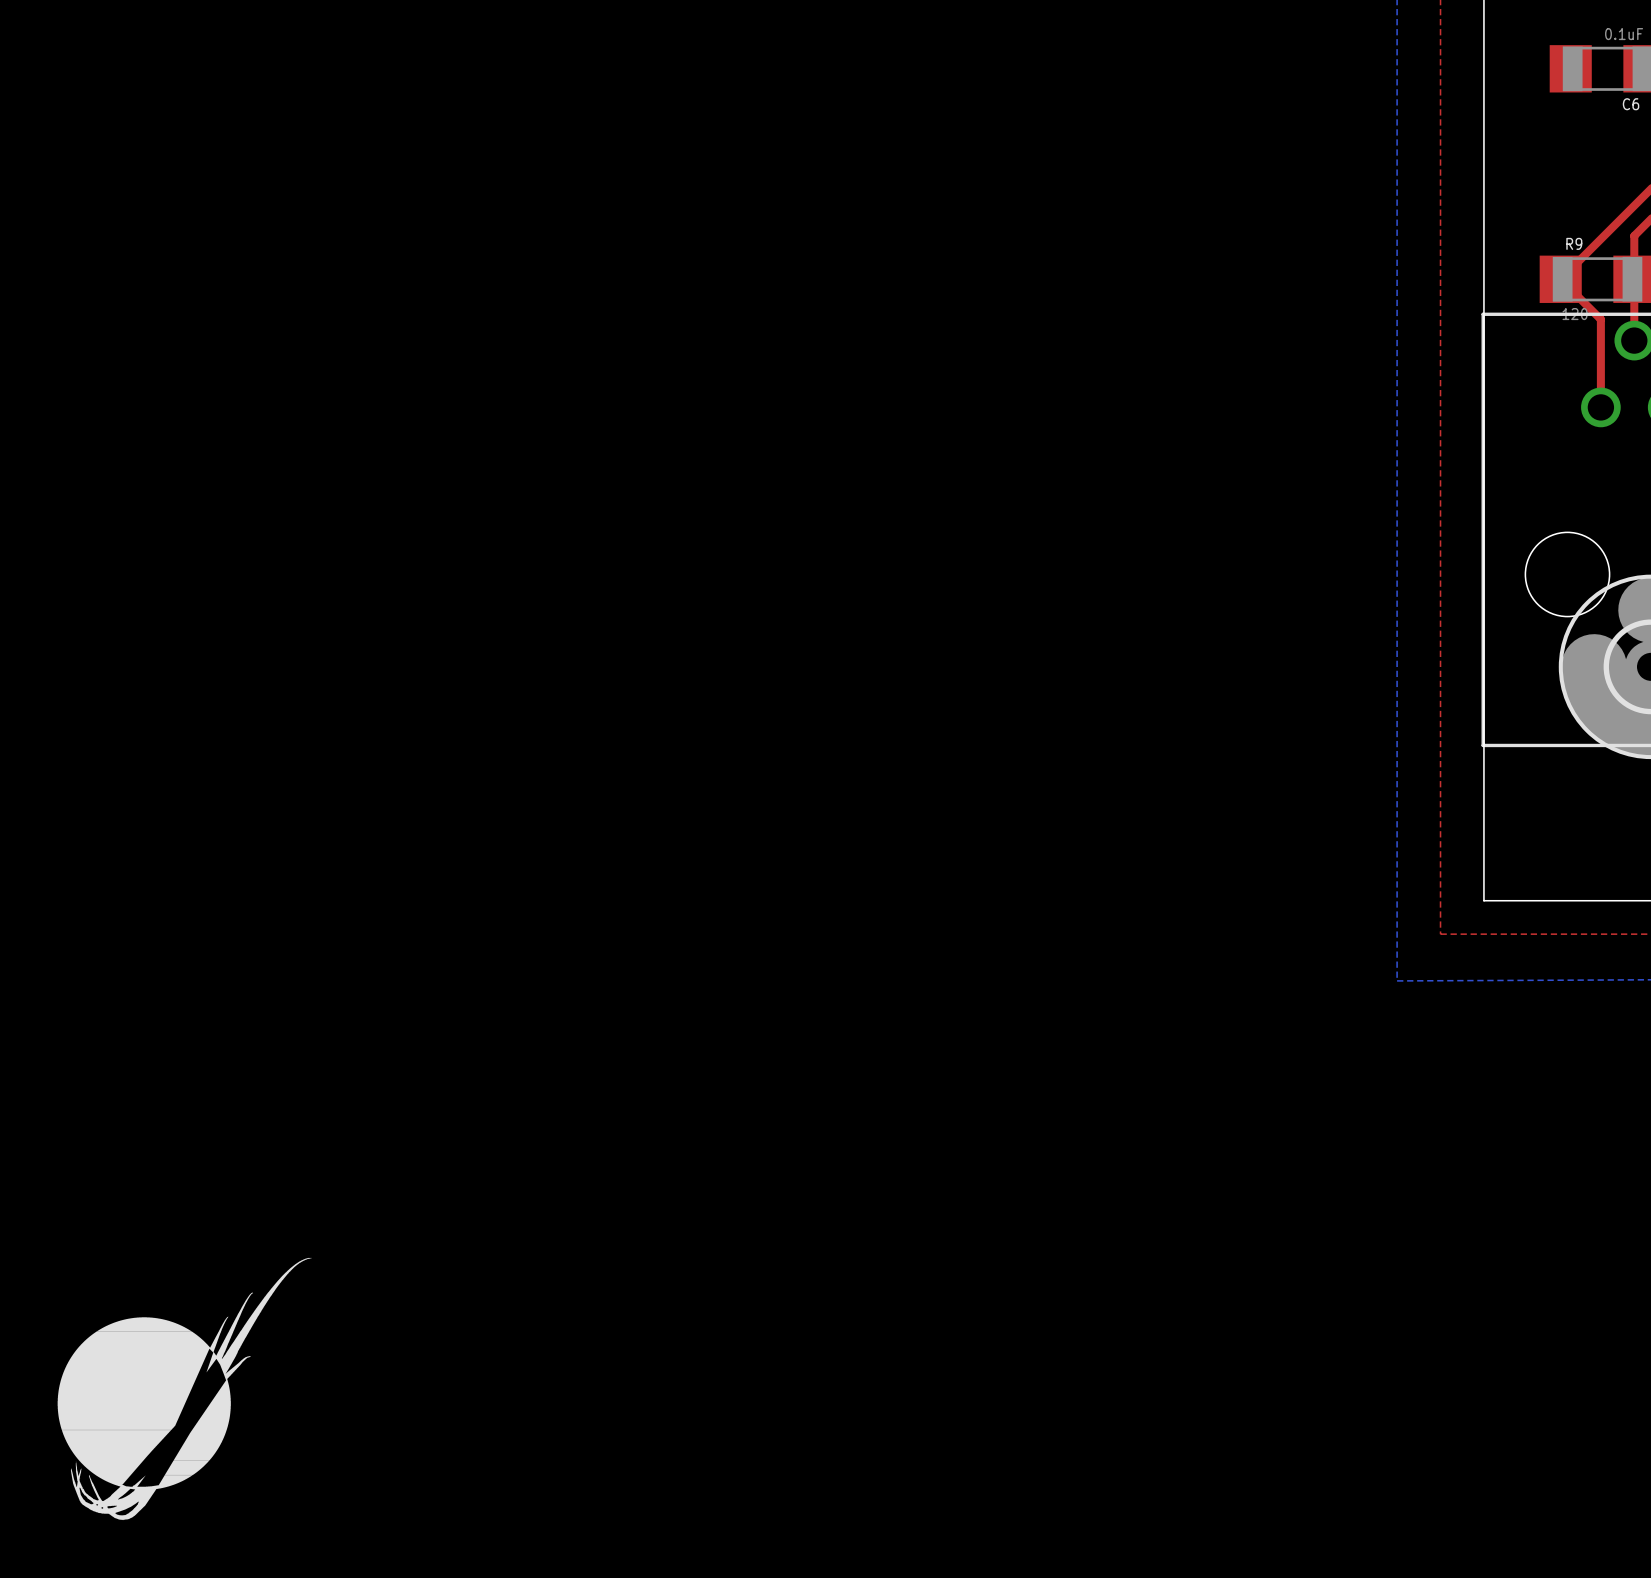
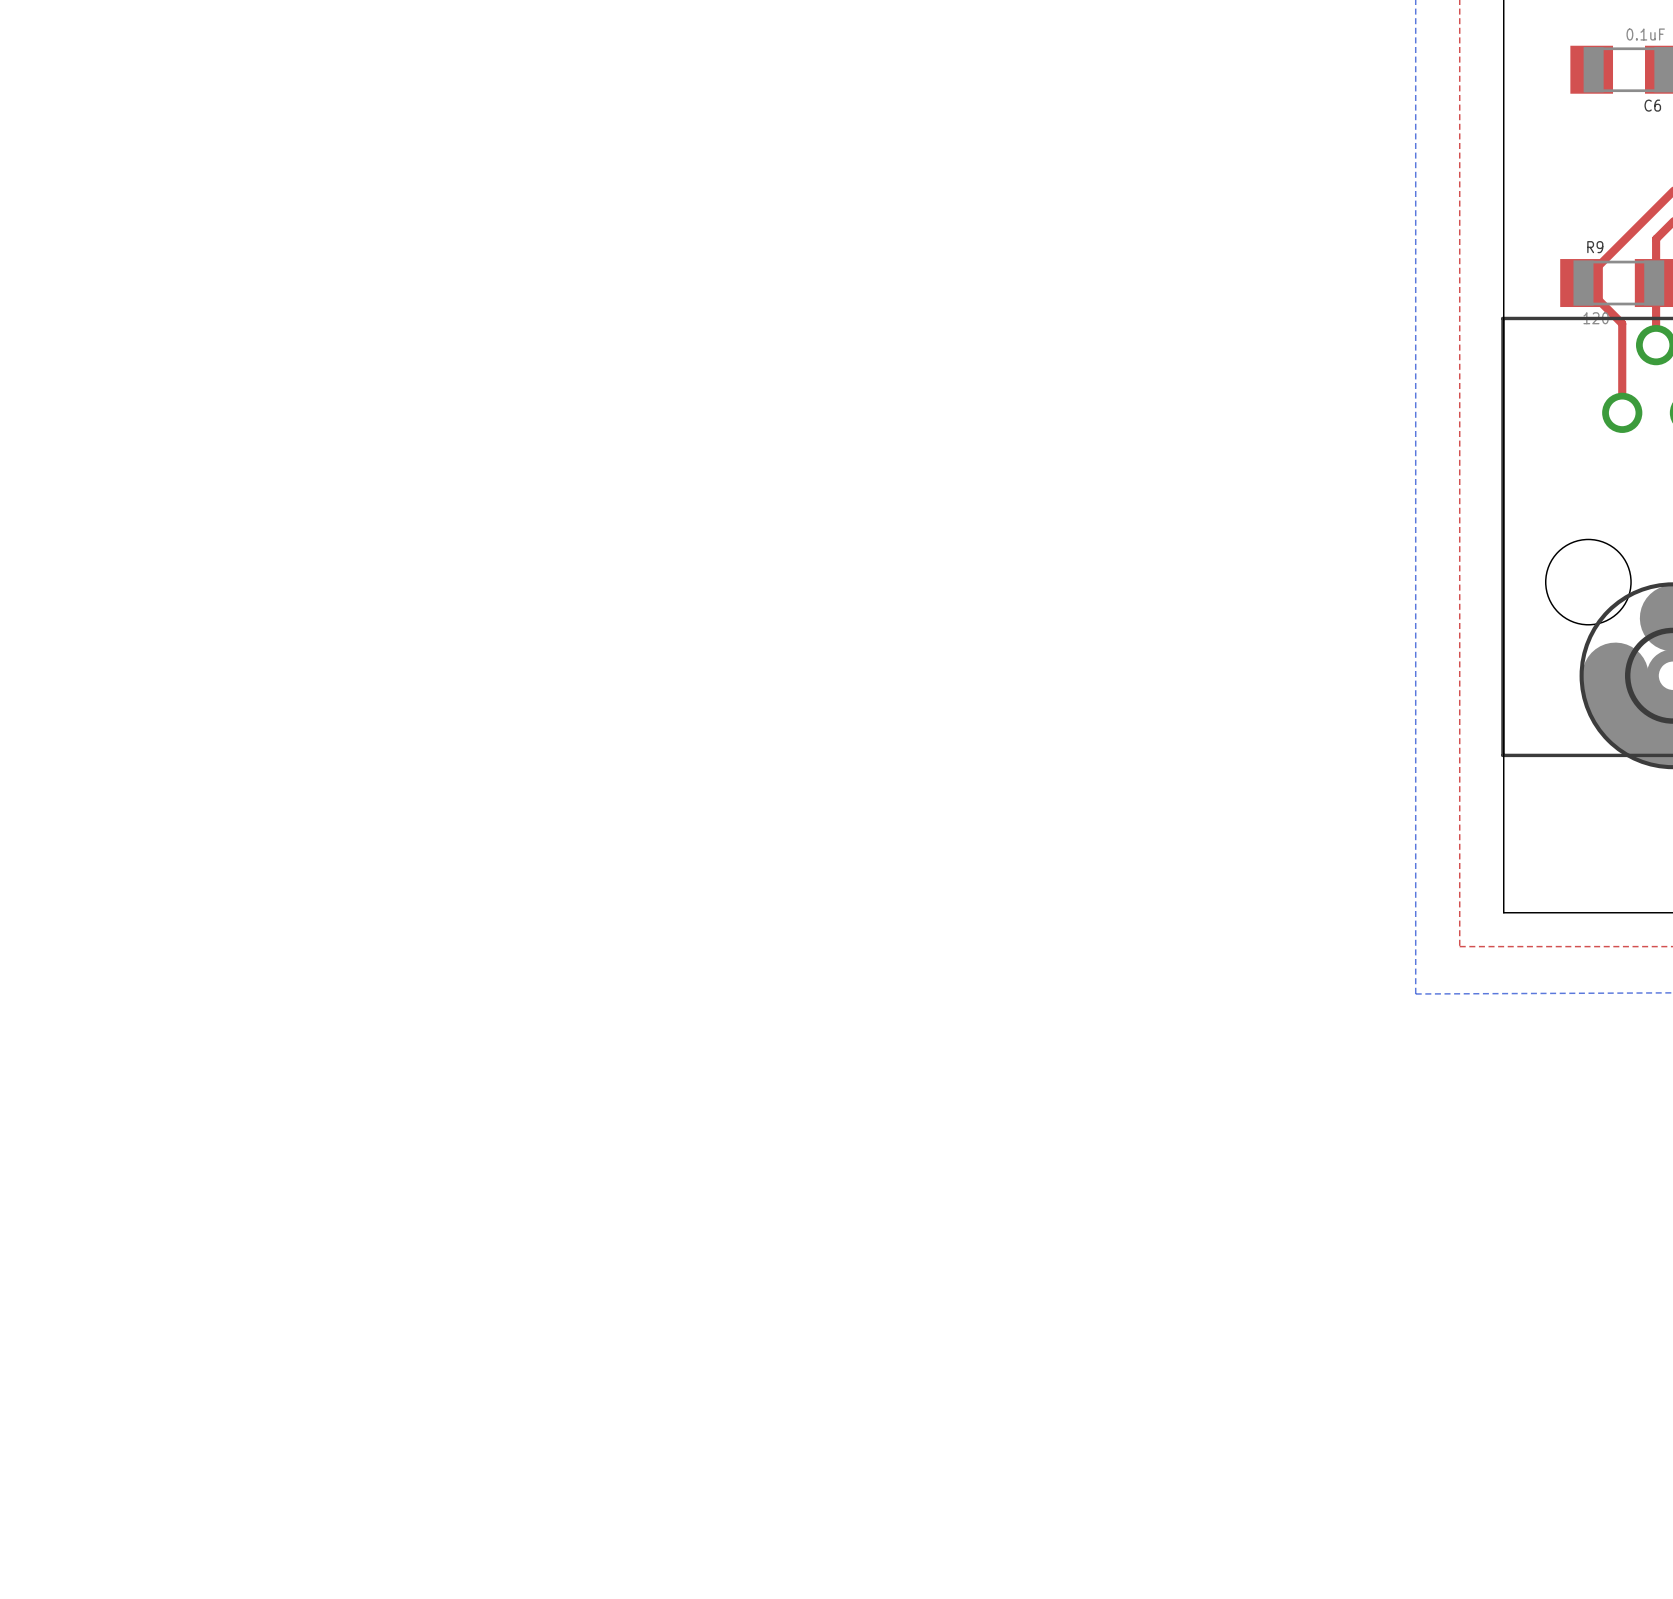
drawing: [57, 1257, 312, 1521] -> none

